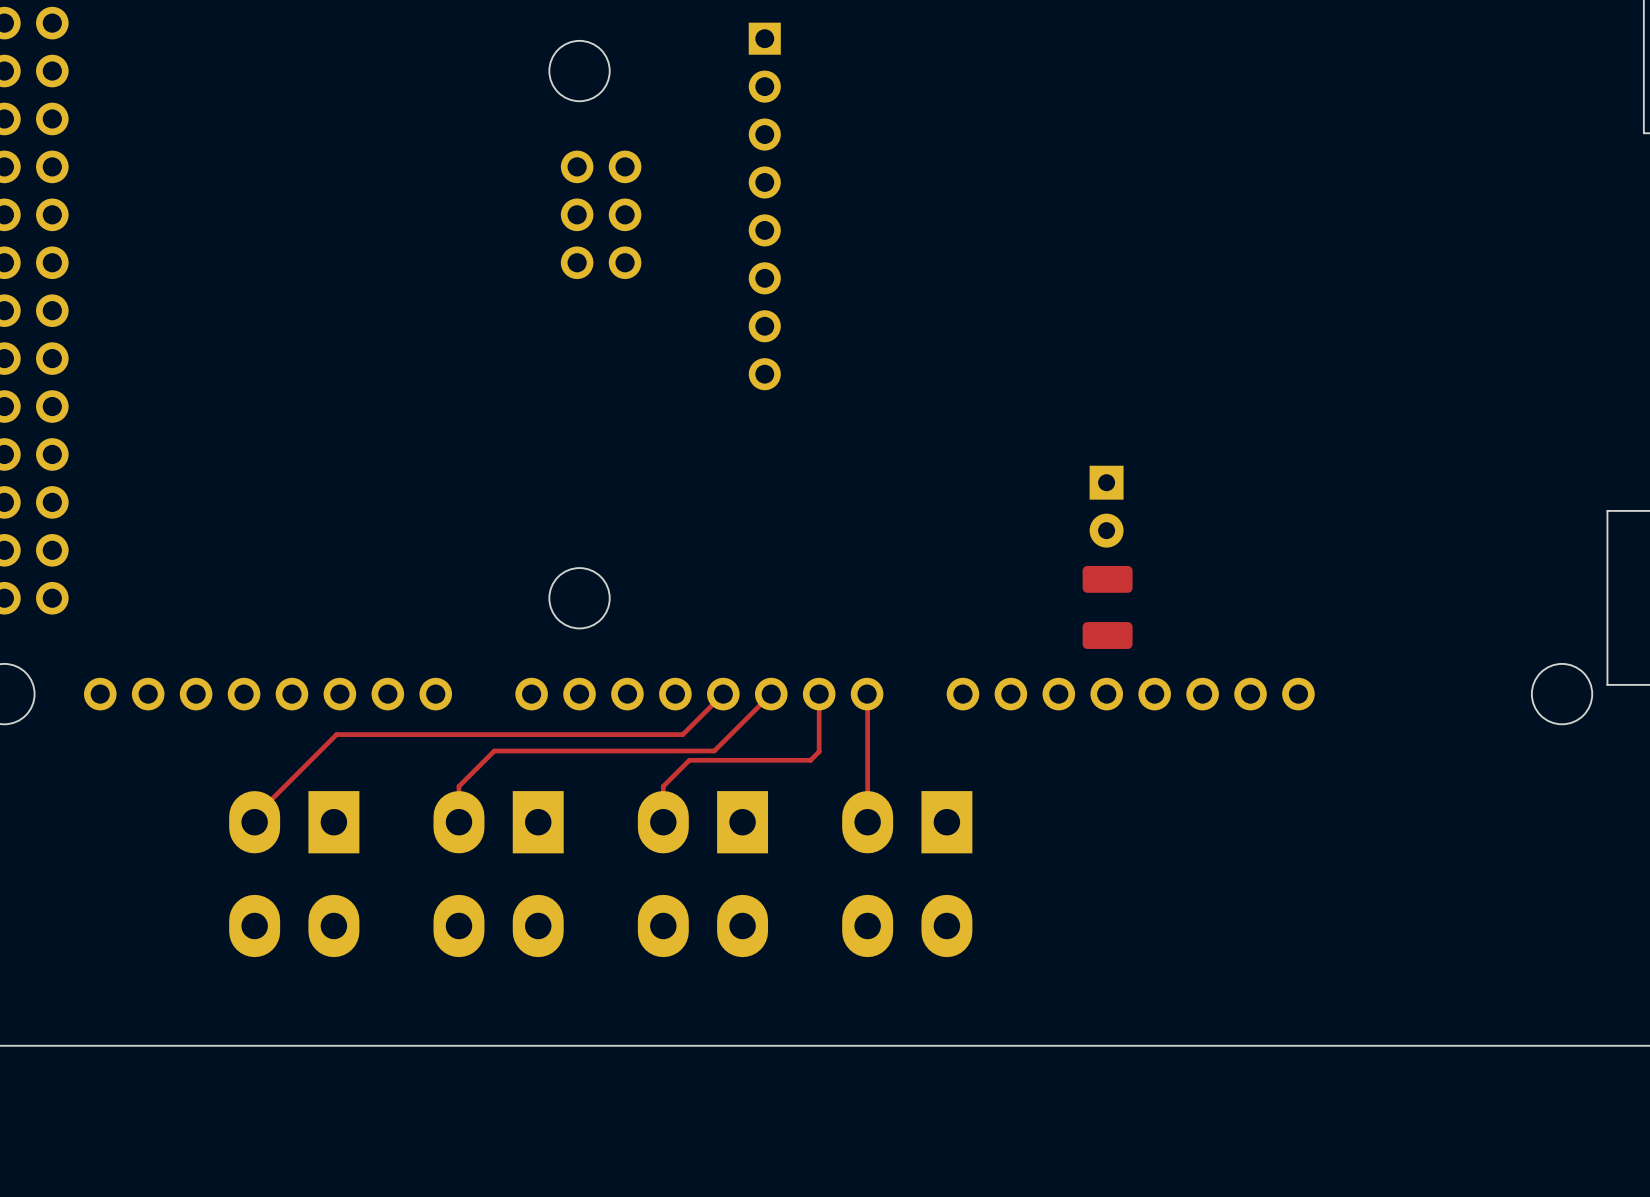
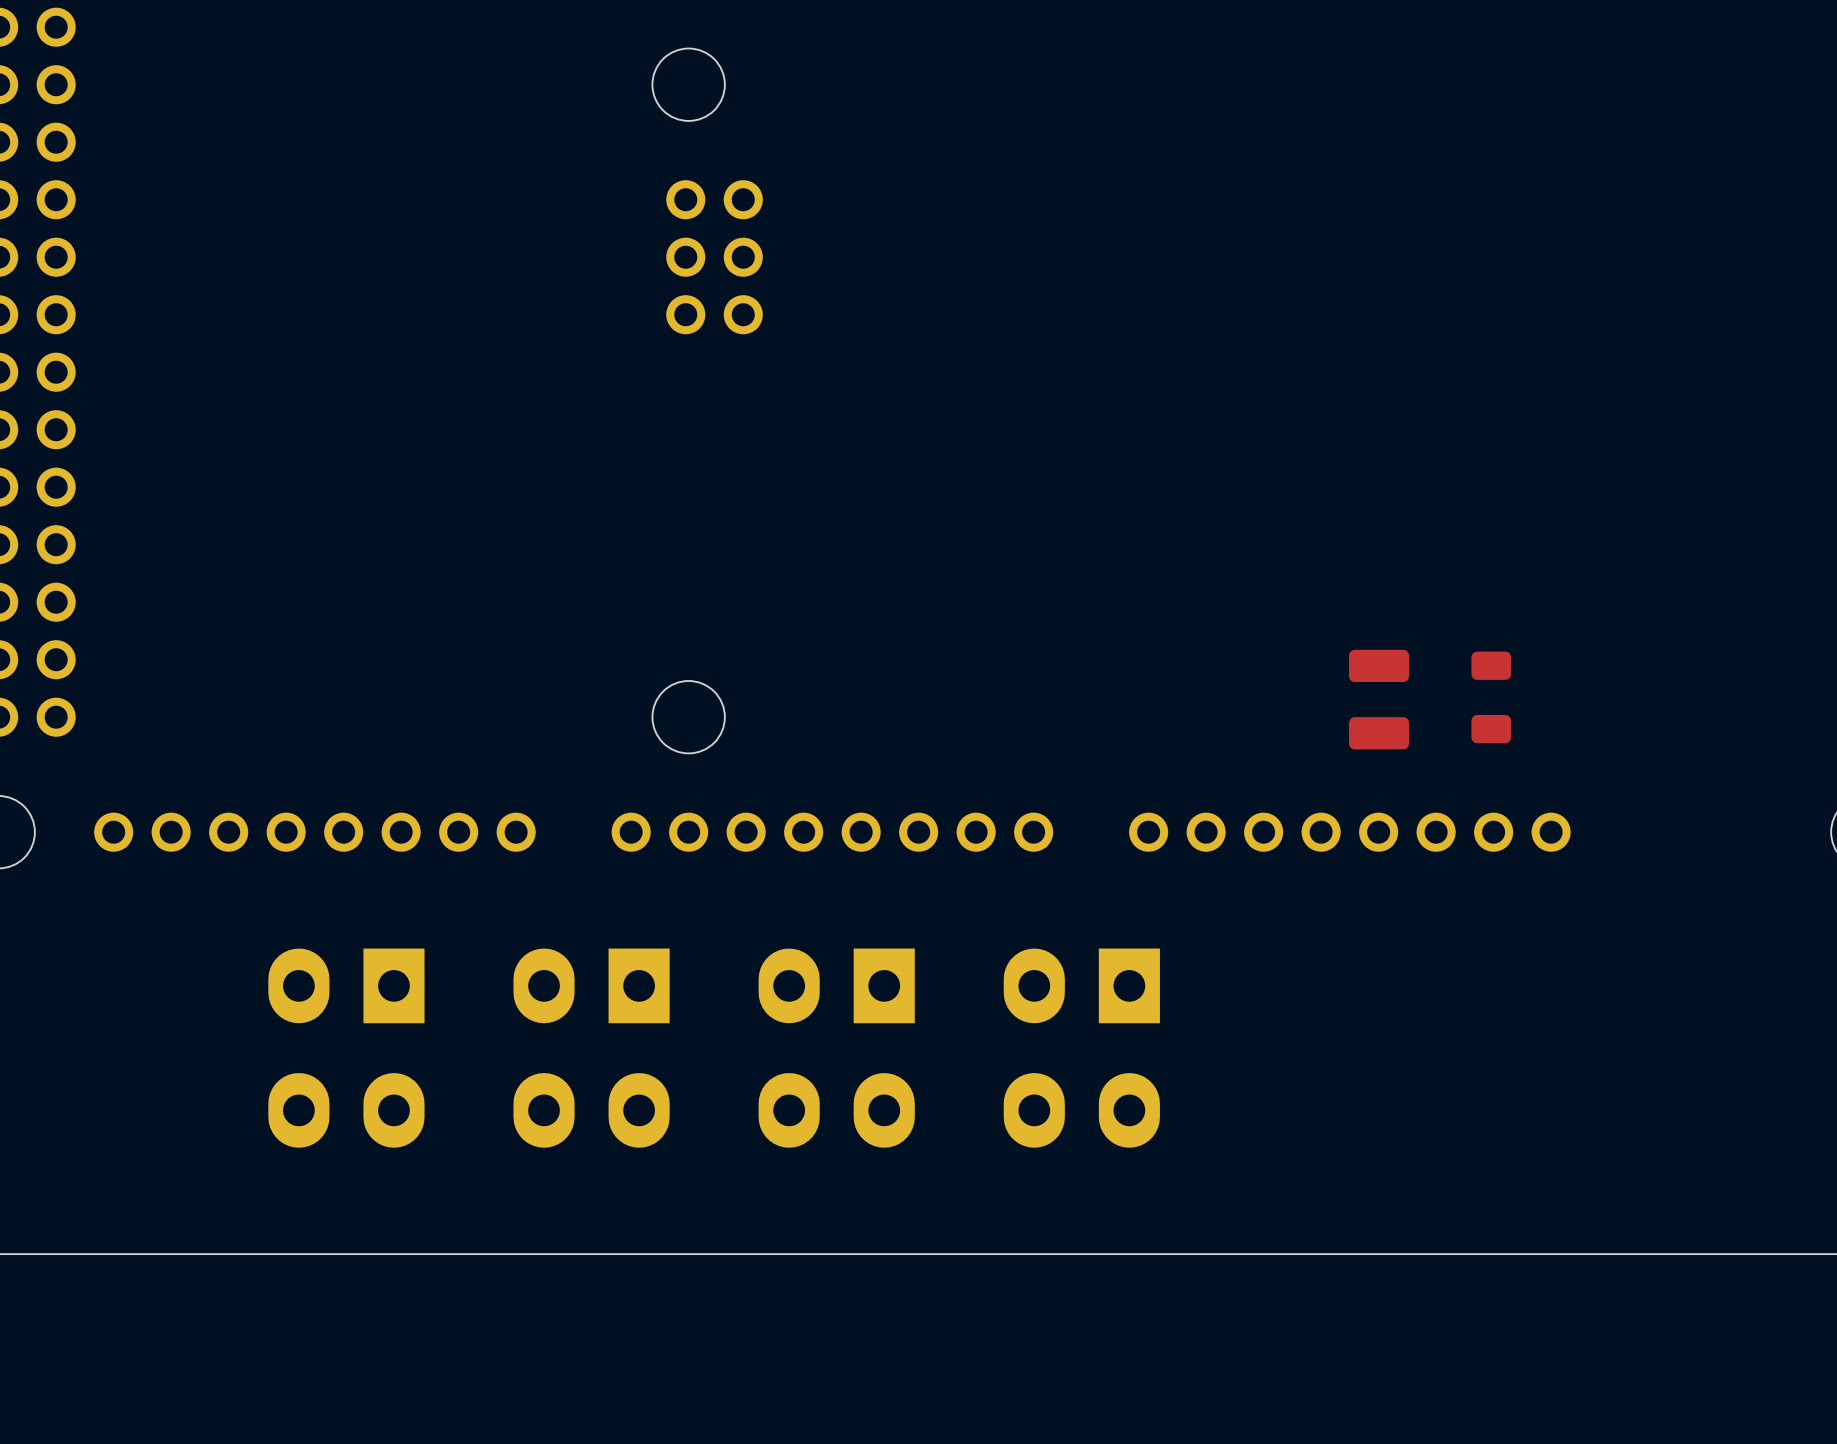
part: (764, 206) -> none
part: (1106, 506) -> none
part: none -> (1491, 697)
part position: (1107, 607) -> (1379, 699)
top track: (723, 694) (682, 734) (336, 734) (254, 816) (254, 822) -> none
top track: (771, 694) (714, 750) (494, 750) (458, 786) (458, 822) -> none
top track: (819, 694) (819, 751) (810, 760) (689, 760) (663, 786) (663, 822) -> none
top track: (867, 694) (867, 822) -> none

